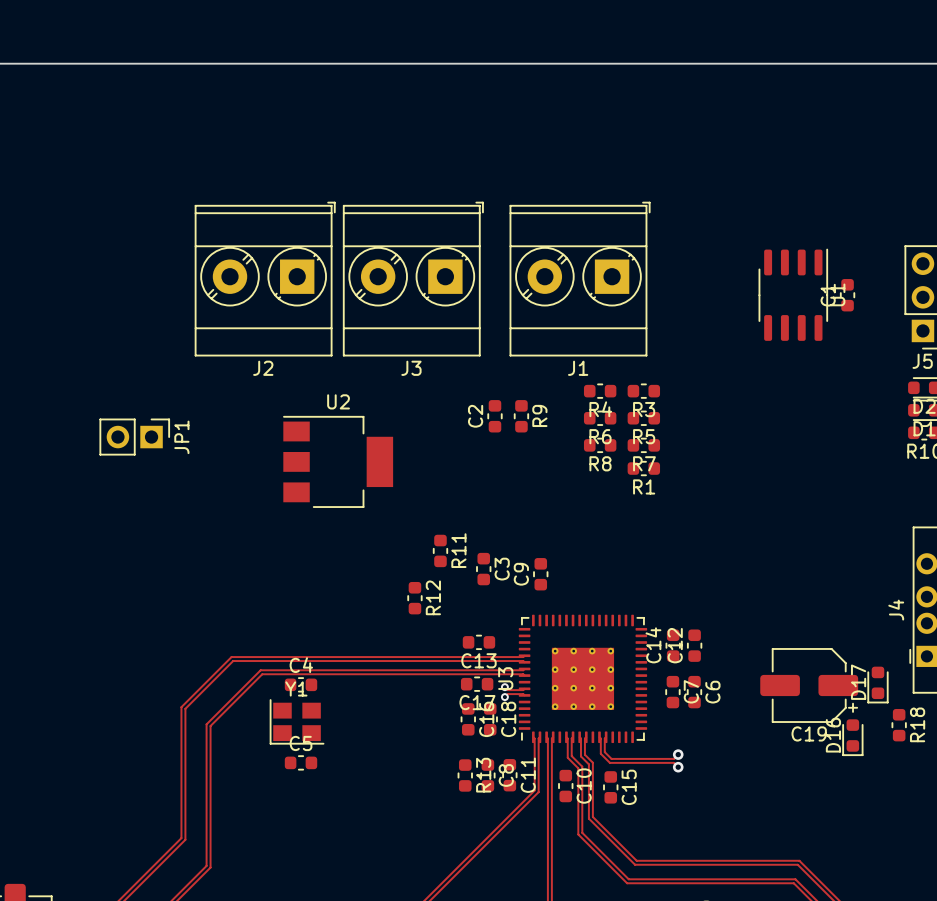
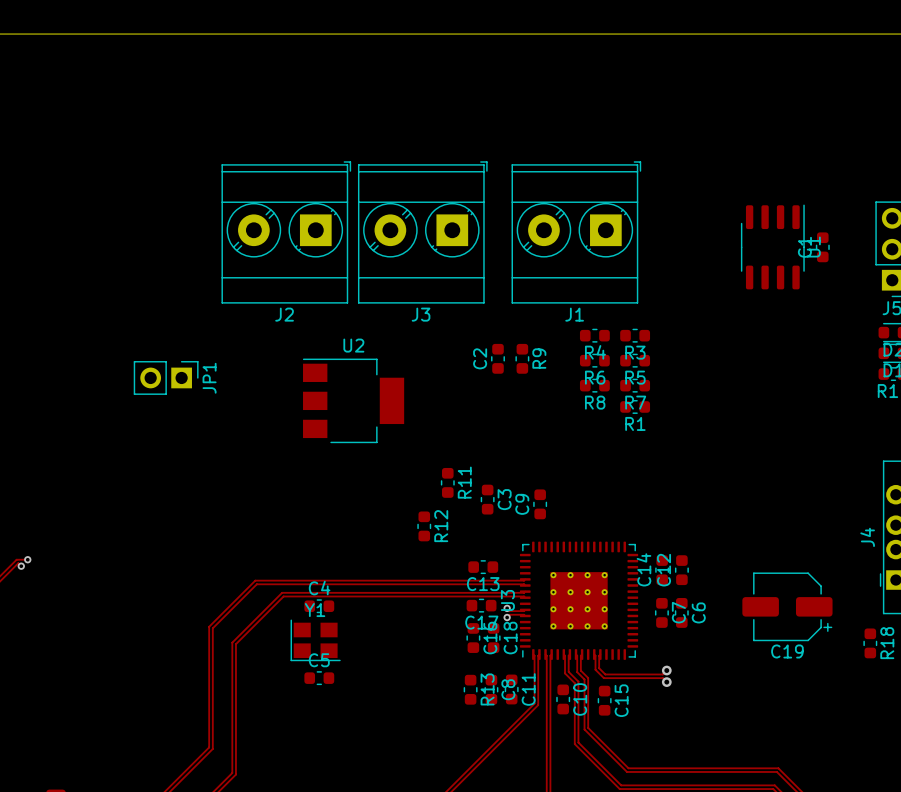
D17: (877, 684) -> none
D16: (852, 737) -> none

